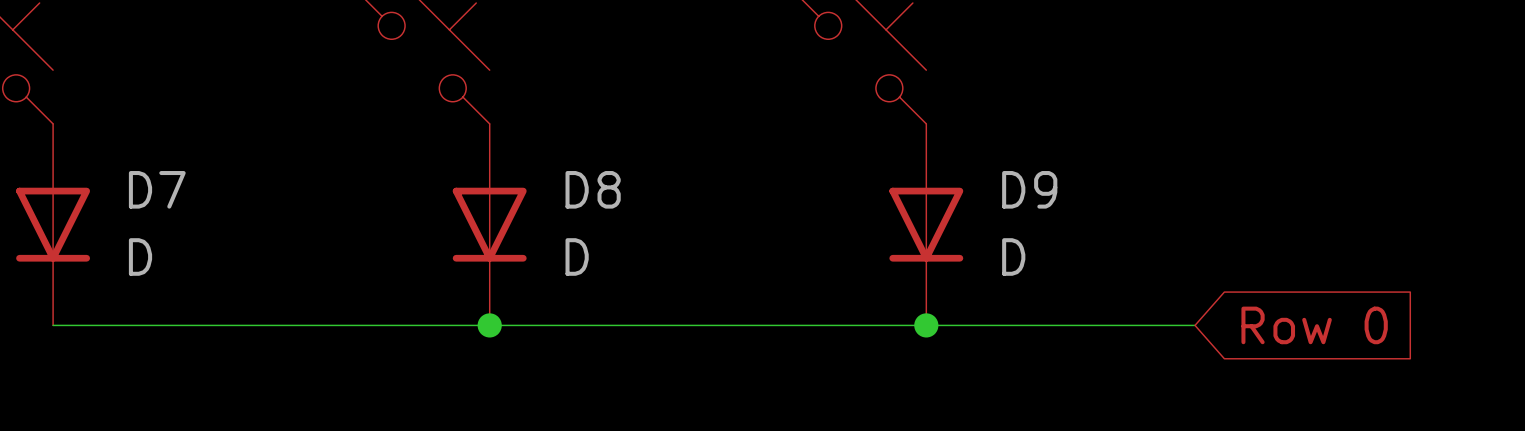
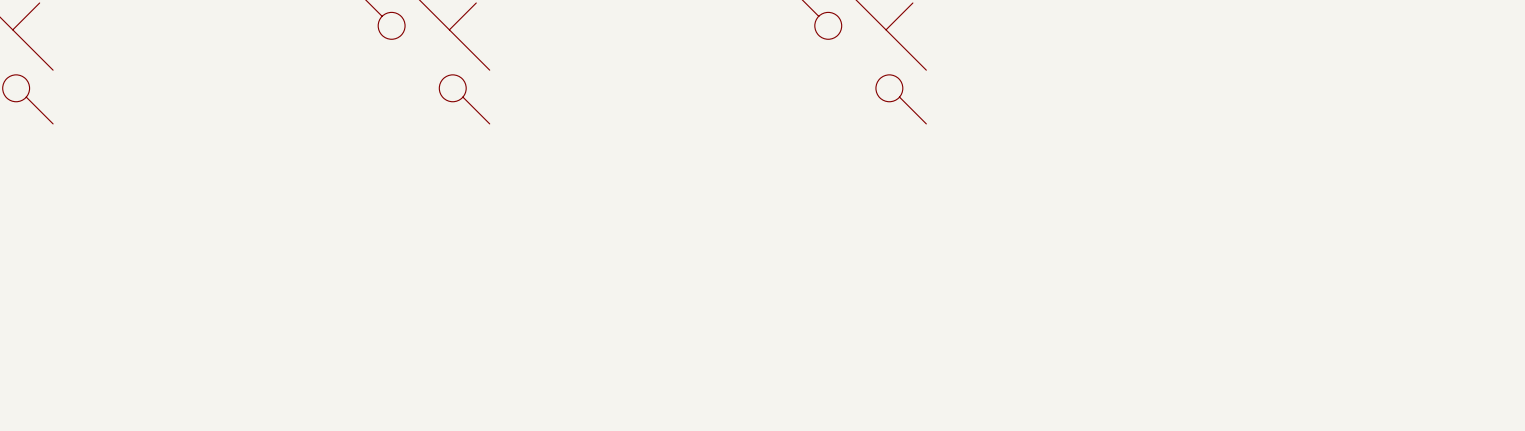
D7: D (53, 224) -> none
D8: D (489, 224) -> none
D9: D (926, 224) -> none
wire: (53, 325) (1195, 325) -> none
junction: (489, 325) -> none
junction: (926, 325) -> none
global label: Row 0 (1314, 325) -> none

